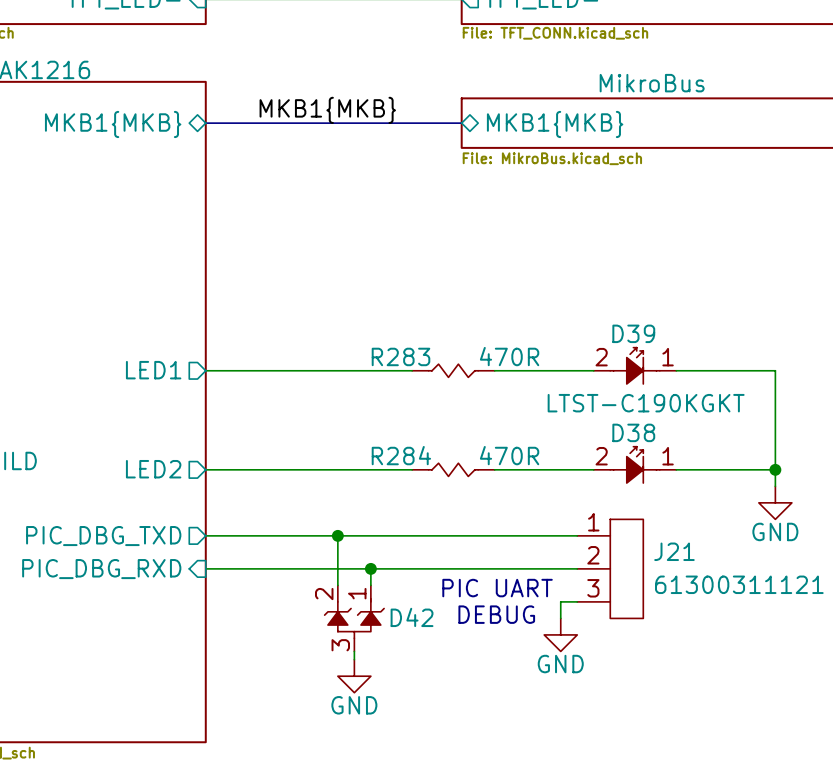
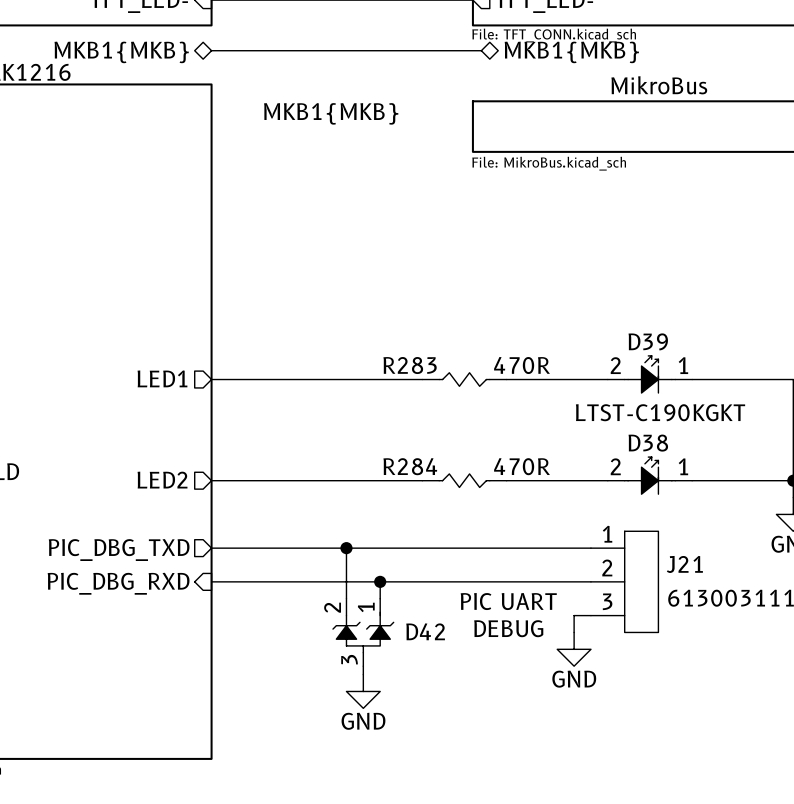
bus: none -> (211, 50) (481, 50)
bus: (205, 123) (461, 123) -> none
sheet pin position: MKB1{MKB} (113, 124) -> MKB1{MKB} (121, 52)
sheet pin position: MKB1{MKB} (555, 124) -> MKB1{MKB} (571, 52)

